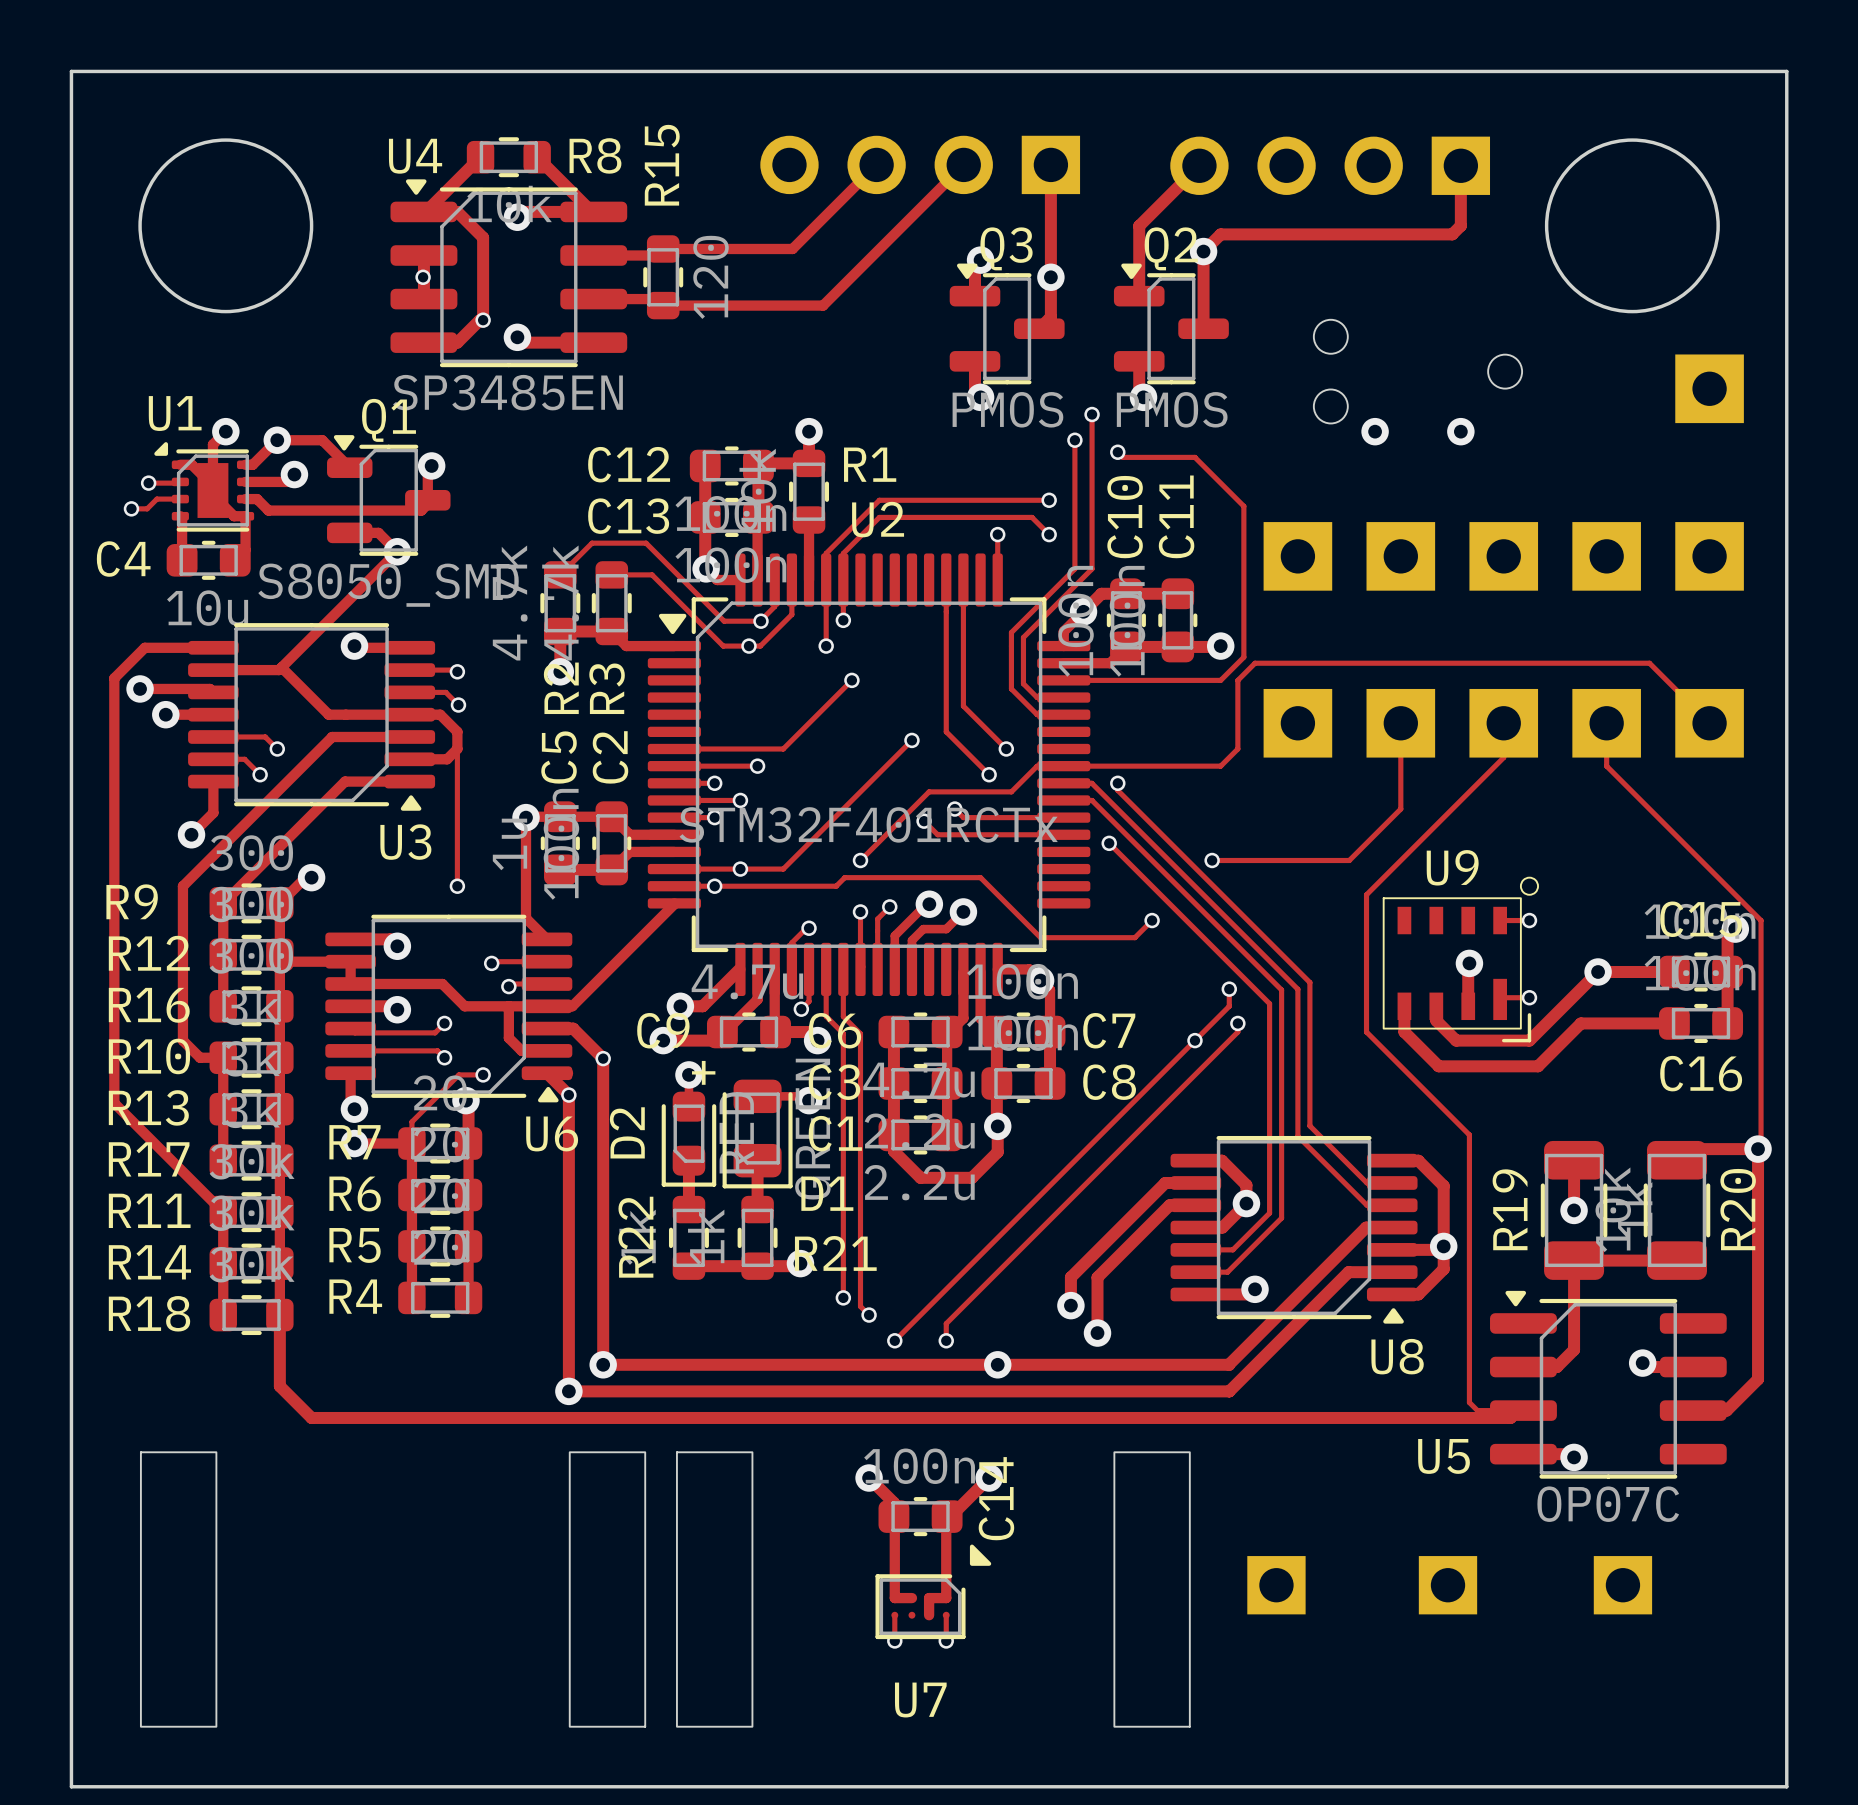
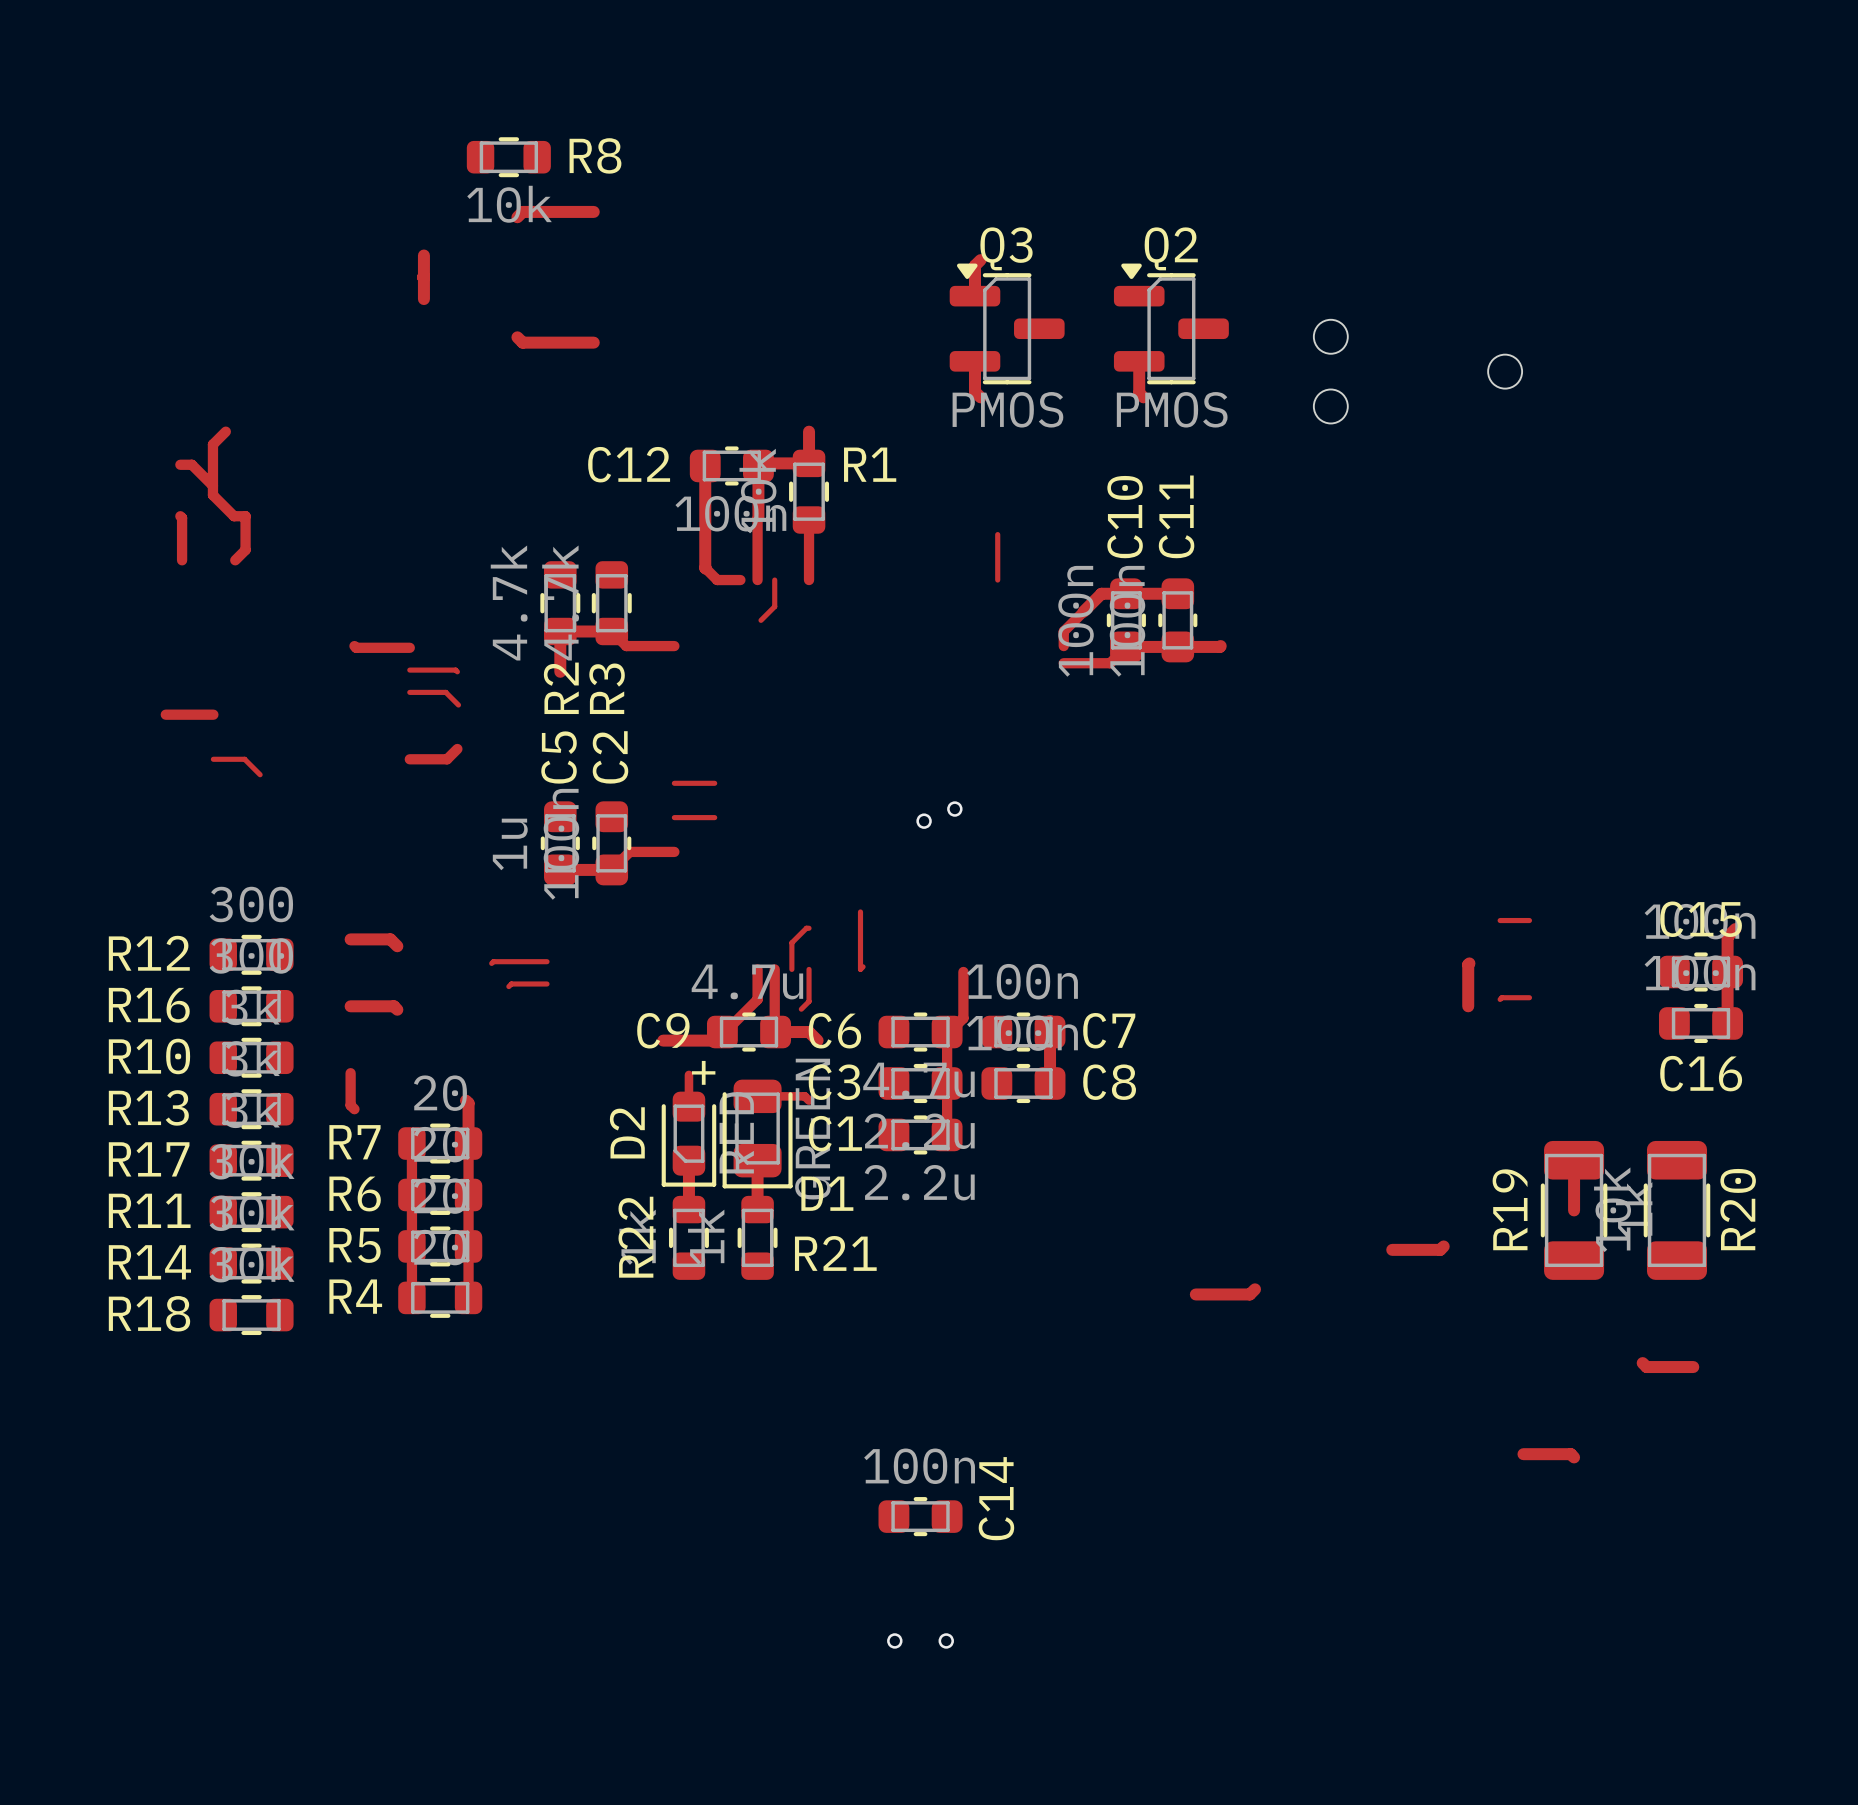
board edge: (71, 71) (1786, 71) (1786, 1786) (71, 1786) (71, 71) -> none
round board edge: [138, 138, 314, 314] -> none
round board edge: [1544, 138, 1720, 314] -> none
track: (480, 157) (425, 211) -> none
track: (537, 157) (591, 211) -> none
track: (876, 164) (792, 248) (663, 248) (656, 255) (593, 255) -> none
part: (920, 164) -> none
track: (963, 164) (823, 305) (663, 305) (656, 299) (593, 299) -> none
track: (1050, 164) (1050, 317) (1039, 328) -> none
track: (1199, 165) (1139, 226) (1139, 296) -> none
part: (1330, 165) -> none
track: (1460, 165) (1460, 225) (1452, 234) (1220, 234) (1203, 251) (1203, 328) -> none
track: (423, 211) (457, 211) (483, 237) (483, 320) (479, 320) (457, 342) (423, 342) -> none
via: (517, 217) -> none
via: (1203, 251) -> none
via: (980, 260) -> none
U4: SP3485EN (508, 273) -> none
via: (423, 277) -> none
R15: 120 (663, 277) -> none
via: (1050, 277) -> none
via: (483, 320) -> none
via: (517, 337) -> none
part: (1709, 388) -> none
via: (980, 397) -> none
via: (1143, 397) -> none
track: (1092, 414) (1092, 568) (1023, 637) (1023, 683) (1037, 697) (1063, 697) -> none
via: (1092, 414) -> none
via: (225, 431) -> none
via: (809, 431) -> none
via: (1375, 431) -> none
via: (1460, 431) -> none
via: (277, 440) -> none
track: (1074, 440) (1074, 568) (1040, 603) -> none
via: (1074, 440) -> none
track: (1117, 452) (1122, 457) (1194, 457) (1243, 506) (1243, 657) (1220, 680) (1063, 680) -> none
via: (1117, 452) -> none
track: (245, 464) (252, 464) (277, 440) (322, 440) (349, 467) -> none
track: (431, 465) (427, 469) (427, 504) (421, 510) (268, 510) (257, 499) (245, 499) -> none
via: (431, 465) -> none
track: (294, 474) (287, 481) (245, 481) -> none
via: (294, 474) -> none
track: (180, 481) (148, 483) -> none
via: (148, 483) -> none
U1: (204, 486) -> none
Q1: S8050_SMD (388, 495) -> none
track: (180, 499) (156, 499) (147, 508) (131, 508) -> none
track: (1049, 500) (879, 500) (826, 553) (826, 646) -> none
via: (1049, 500) -> none
via: (131, 508) -> none
C13: 100n (731, 517) -> none
track: (349, 532) (378, 532) (397, 551) (279, 670) (213, 670) -> none
via: (997, 534) -> none
track: (1049, 534) (1032, 517) (879, 517) (843, 553) (843, 620) -> none
via: (1049, 534) -> none
via: (397, 551) -> none
part: (1297, 556) -> none
part: (1400, 556) -> none
part: (1503, 556) -> none
part: (1606, 556) -> none
part: (1709, 556) -> none
C4: 10u (208, 560) -> none
via: (706, 568) -> none
track: (560, 574) (592, 543) (646, 543) (724, 621) (761, 621) -> none
track: (611, 574) (652, 574) (723, 646) (760, 646) (791, 614) (791, 580) -> none
track: (946, 580) (946, 731) (989, 774) -> none
track: (963, 580) (963, 706) (1006, 749) -> none
track: (1040, 603) (1011, 632) (1011, 688) (1037, 714) (1063, 714) -> none
via: (1083, 611) -> none
via: (843, 620) -> none
via: (761, 621) -> none
via: (354, 646) -> none
via: (749, 646) -> none
via: (826, 646) -> none
via: (1220, 646) -> none
track: (213, 647) (144, 647) (114, 678) (114, 1103) (223, 1212) (223, 1315) -> none
track: (281, 667) (328, 714) (440, 714) (457, 731) (457, 886) -> none
via: (457, 671) -> none
via: (560, 671) -> none
track: (851, 680) (783, 749) (674, 749) -> none
via: (851, 680) -> none
track: (140, 688) (209, 688) (213, 692) -> none
via: (140, 688) -> none
via: (458, 705) -> none
via: (165, 714) -> none
U3: (311, 716) -> none
part: (1297, 723) -> none
track: (1400, 723) (1400, 809) (1349, 860) (1212, 860) -> none
part: (1400, 723) -> none
track: (1503, 723) (1503, 757) (1366, 894) (1366, 1032) (1469, 1134) (1469, 1402) (1477, 1410) (1523, 1410) -> none
part: (1503, 723) -> none
track: (1606, 723) (1606, 766) (1761, 920) (1761, 1146) (1758, 1149) -> none
part: (1606, 723) -> none
track: (1709, 723) (1649, 663) (1255, 663) (1237, 680) (1237, 749) (1220, 766) (1037, 766) (1011, 791) (929, 791) (860, 860) -> none
part: (1709, 723) -> none
track: (213, 736) (265, 736) (277, 749) -> none
track: (409, 736) (332, 736) (182, 886) (182, 1040) (200, 1057) (223, 1057) (223, 1160) -> none
track: (911, 740) (783, 869) (674, 869) -> none
via: (911, 740) -> none
via: (277, 749) -> none
via: (1006, 749) -> none
track: (674, 766) (757, 766) -> none
via: (757, 766) -> none
via: (260, 774) -> none
U2: STM32F401RCTx (869, 774) -> none
via: (989, 774) -> none
track: (213, 781) (213, 812) (191, 834) -> none
track: (409, 781) (345, 781) (223, 903) (223, 1006) -> none
via: (714, 783) -> none
track: (1063, 783) (1091, 783) (1297, 989) (1297, 1136) (1366, 1205) (1392, 1205) -> none
track: (1117, 783) (1117, 790) (1309, 982) (1309, 1125) (1366, 1182) (1392, 1182) -> none
via: (1117, 783) -> none
track: (674, 800) (740, 800) -> none
via: (740, 800) -> none
track: (1063, 800) (1092, 800) (1281, 990) (1281, 1218) (1227, 1272) (1195, 1272) -> none
track: (954, 809) (963, 817) (1063, 817) -> none
via: (526, 817) -> none
via: (714, 817) -> none
track: (924, 821) (937, 834) (1063, 834) -> none
via: (191, 834) -> none
track: (674, 834) (629, 834) (611, 816) (526, 816) (526, 918) (547, 939) -> none
track: (1109, 843) (1269, 1003) (1269, 1213) (1232, 1249) (1195, 1249) -> none
via: (1109, 843) -> none
via: (860, 860) -> none
via: (1212, 860) -> none
via: (740, 869) -> none
track: (311, 877) (305, 877) (279, 903) (279, 1386) (311, 1417) (1510, 1417) (1519, 1409) -> none
via: (311, 877) -> none
via: (457, 886) -> none
track: (674, 886) (836, 886) (844, 877) (980, 877) (1040, 937) (1134, 937) (1152, 920) -> none
via: (714, 886) -> none
R9: 300 (251, 903) -> none
track: (674, 903) (572, 1006) (464, 1006) (442, 984) (350, 984) (350, 961) (286, 961) (279, 954) -> none
track: (929, 904) (926, 904) (894, 935) (894, 969) -> none
via: (929, 904) -> none
track: (889, 906) (877, 919) (877, 969) -> none
via: (889, 906) -> none
via: (860, 911) -> none
via: (963, 911) -> none
track: (963, 920) (963, 911) (946, 929) (923, 929) (911, 940) (911, 969) -> none
via: (1152, 920) -> none
via: (1529, 920) -> none
via: (809, 928) -> none
via: (1735, 929) -> none
via: (397, 946) -> none
U9: (1460, 959) -> none
via: (491, 963) -> none
via: (1469, 963) -> none
track: (739, 969) (702, 1006) (680, 1006) -> none
track: (826, 969) (826, 1016) (843, 1033) (843, 1297) -> none
track: (843, 969) (843, 1016) (860, 1033) (860, 1306) (869, 1315) -> none
track: (997, 969) (1029, 969) (1050, 990) (1050, 1032) -> none
track: (980, 971) (980, 1018) (996, 1034) (997, 1152) (971, 1177) (920, 1177) (893, 1151) (893, 1034) -> none
via: (1598, 971) -> none
track: (1674, 971) (1598, 971) (1529, 1040) (1456, 1040) (1436, 1020) (1436, 1006) -> none
via: (1040, 980) -> none
via: (508, 986) -> none
track: (1229, 989) (1229, 1006) (894, 1340) -> none
via: (1229, 989) -> none
via: (1529, 997) -> none
track: (508, 1006) (508, 1038) (521, 1050) (547, 1050) -> none
via: (680, 1006) -> none
track: (1404, 1006) (1404, 1032) (1438, 1066) (1538, 1066) (1580, 1023) (1674, 1023) -> none
U6: (448, 1008) -> none
via: (397, 1009) -> none
via: (801, 1009) -> none
track: (444, 1023) (435, 1032) (354, 1032) (350, 1028) -> none
via: (444, 1023) -> none
track: (1237, 1023) (1237, 1032) (946, 1323) (946, 1340) -> none
via: (1237, 1023) -> none
track: (547, 1028) (573, 1028) (603, 1058) (603, 1364) (1229, 1364) -> none
via: (663, 1040) -> none
via: (817, 1040) -> none
via: (1194, 1040) -> none
track: (350, 1050) (437, 1050) (444, 1057) -> none
via: (444, 1057) -> none
via: (603, 1058) -> none
track: (567, 1073) (547, 1073) (568, 1095) (568, 1391) (1229, 1391) (1348, 1272) (1392, 1272) -> none
track: (483, 1074) (458, 1074) (411, 1121) (411, 1143) (354, 1143) -> none
via: (483, 1074) -> none
via: (688, 1074) -> none
via: (568, 1095) -> none
via: (465, 1100) -> none
via: (809, 1100) -> none
via: (354, 1109) -> none
via: (997, 1126) -> none
via: (354, 1143) -> none
track: (1758, 1149) (1758, 1379) (1726, 1410) (1693, 1410) -> none
track: (1758, 1149) (1688, 1149) (1676, 1160) -> none
via: (1758, 1149) -> none
track: (1195, 1160) (1221, 1160) (1246, 1185) (1246, 1203) (1222, 1227) (1195, 1227) -> none
track: (1392, 1160) (1418, 1160) (1443, 1185) (1443, 1269) (1418, 1294) (1392, 1294) -> none
track: (1195, 1182) (1165, 1182) (1070, 1277) (1070, 1305) -> none
via: (1246, 1203) -> none
track: (1195, 1205) (1169, 1205) (1097, 1277) (1097, 1333) -> none
via: (1574, 1210) -> none
track: (1392, 1227) (1366, 1227) (1229, 1364) -> none
U8: (1294, 1229) -> none
via: (1443, 1246) -> none
track: (1676, 1260) (1574, 1260) (1574, 1349) (1556, 1367) (1523, 1367) -> none
track: (800, 1263) (797, 1266) (688, 1266) -> none
via: (800, 1263) -> none
via: (1255, 1289) -> none
via: (843, 1297) -> none
via: (1070, 1305) -> none
via: (869, 1315) -> none
via: (1097, 1333) -> none
via: (894, 1340) -> none
via: (946, 1340) -> none
via: (1642, 1363) -> none
via: (603, 1364) -> none
via: (997, 1364) -> none
U5: OP07C (1608, 1384) -> none
via: (568, 1391) -> none
via: (1574, 1457) -> none
track: (869, 1478) (893, 1502) (894, 1598) (911, 1598) -> none
via: (869, 1478) -> none
track: (989, 1478) (950, 1516) (946, 1517) (946, 1598) (929, 1598) (929, 1615) -> none
via: (989, 1478) -> none
part: (1276, 1585) -> none
part: (1447, 1585) -> none
part: (1622, 1585) -> none
part: (178, 1589) -> none
part: (607, 1589) -> none
part: (714, 1589) -> none
part: (1152, 1589) -> none
U7: (933, 1591) -> none
track: (894, 1615) (894, 1640) -> none
track: (946, 1615) (946, 1640) -> none

